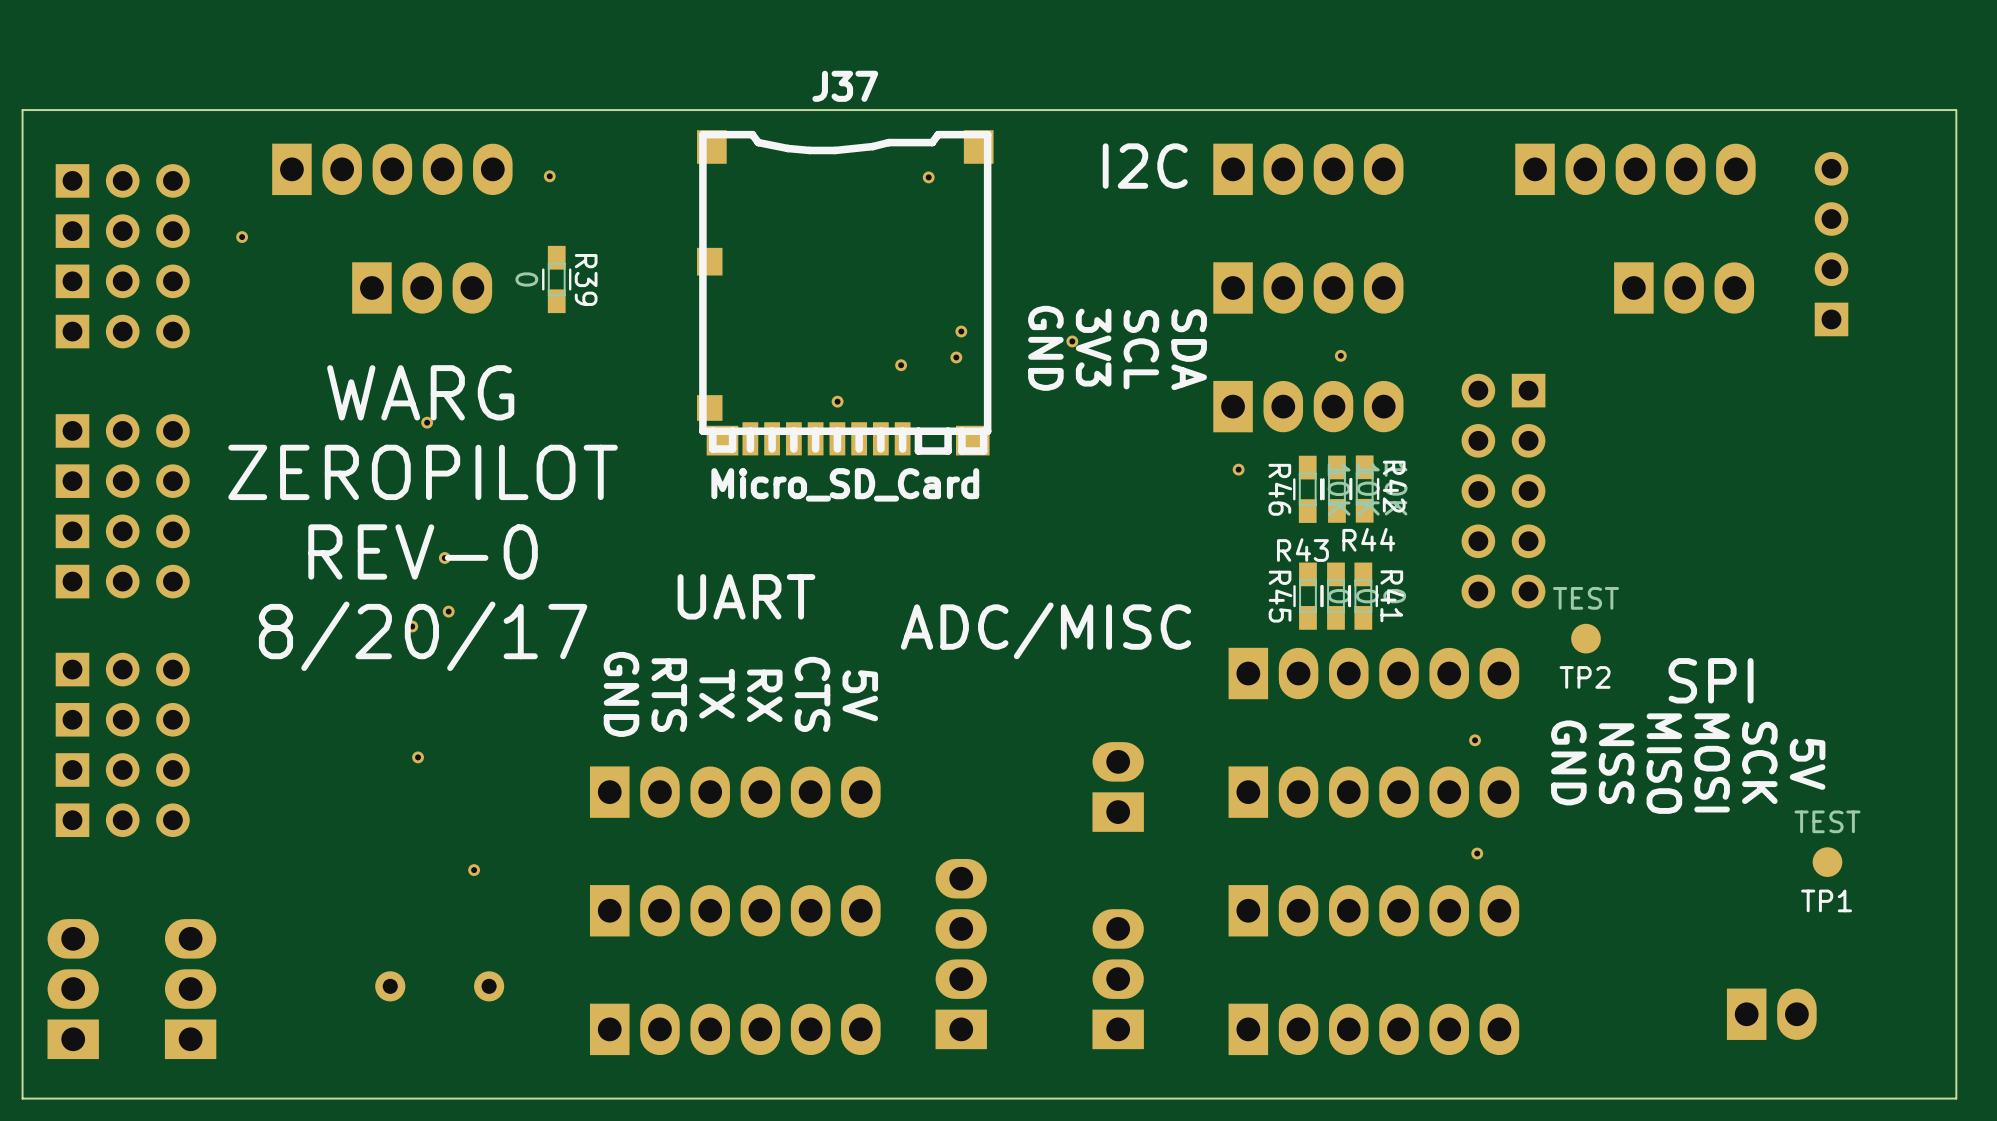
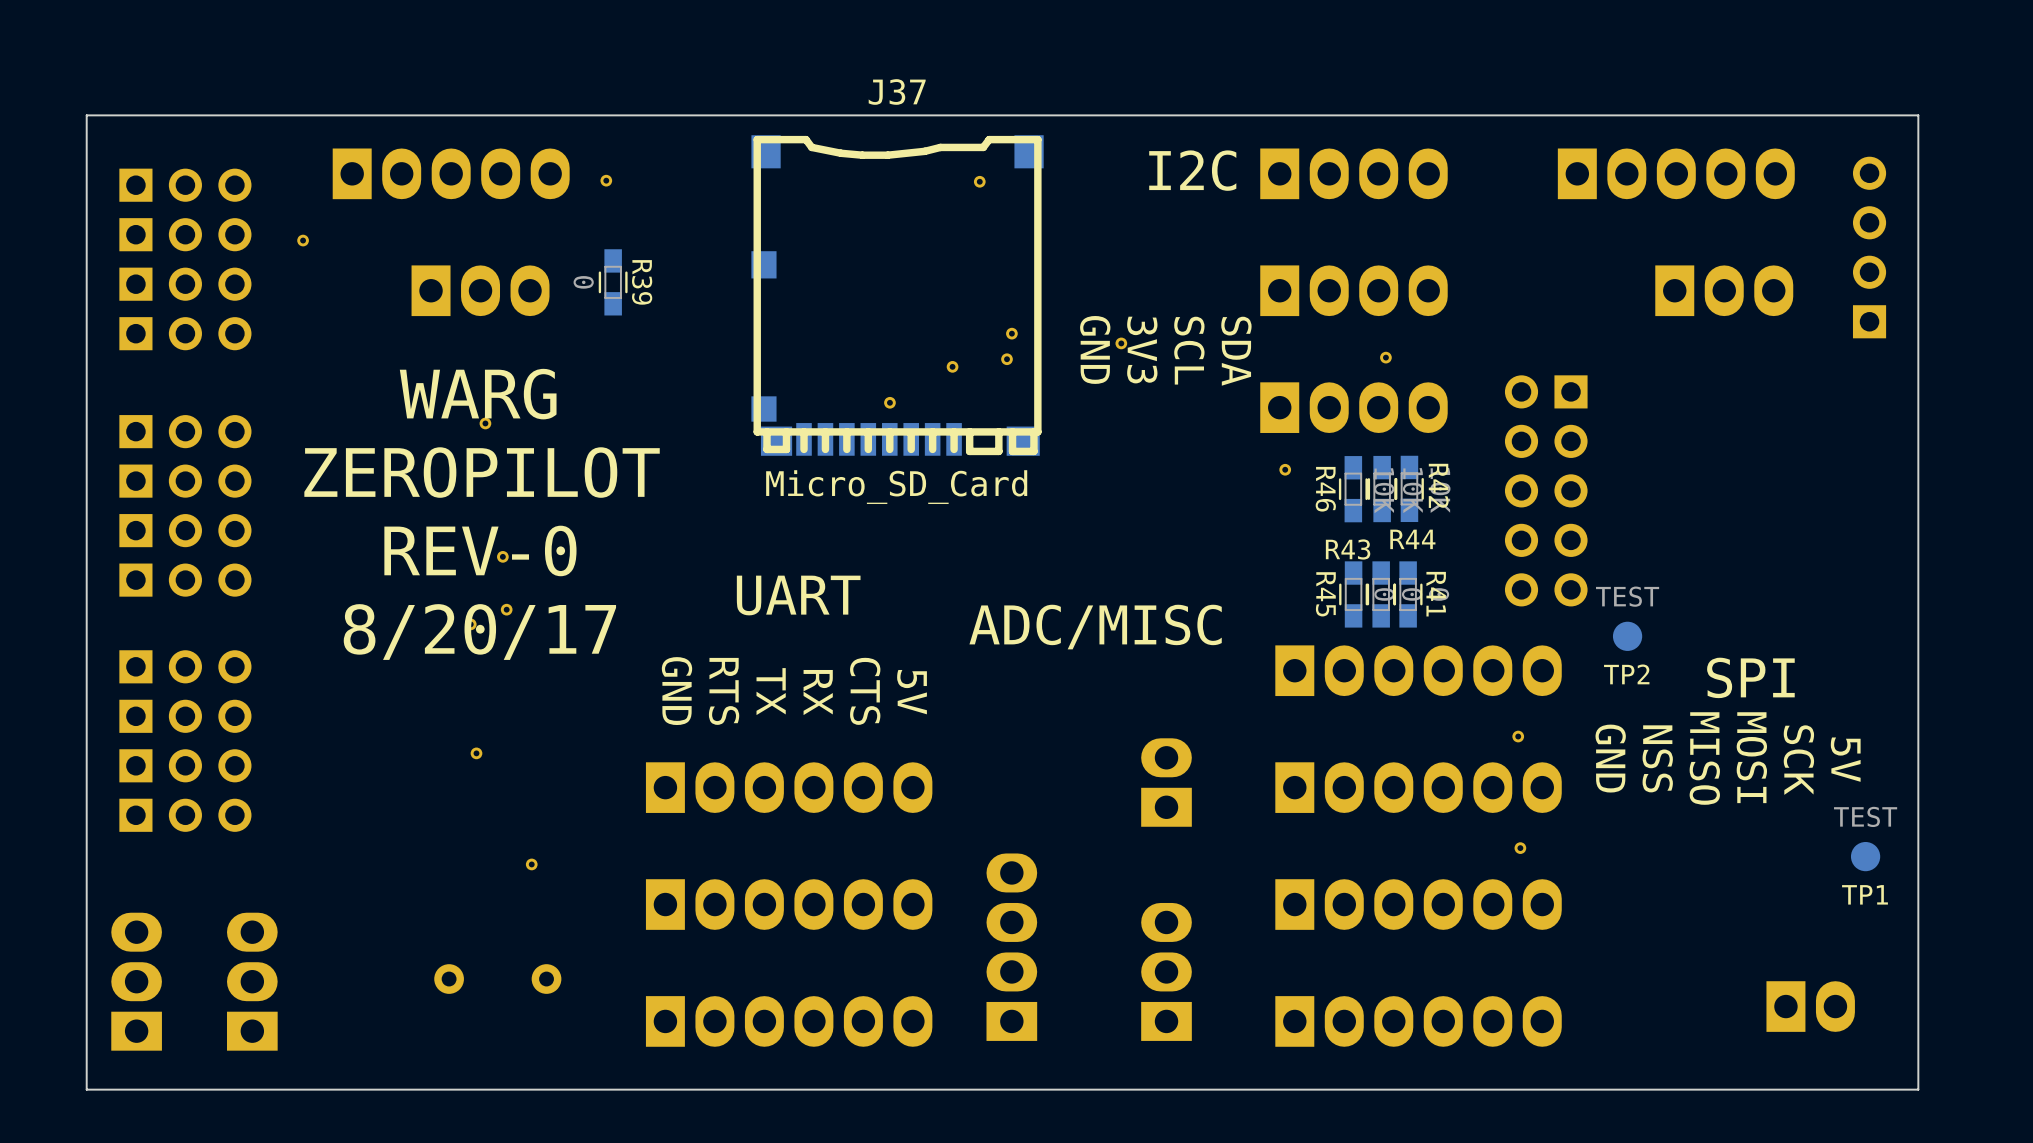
board edge: (1956, 110) (1881, 110) -> (1918, 1089) (1918, 115)
board edge: (1956, 110) (1956, 1098) -> none
board edge: (1956, 1098) (1881, 1098) -> none

